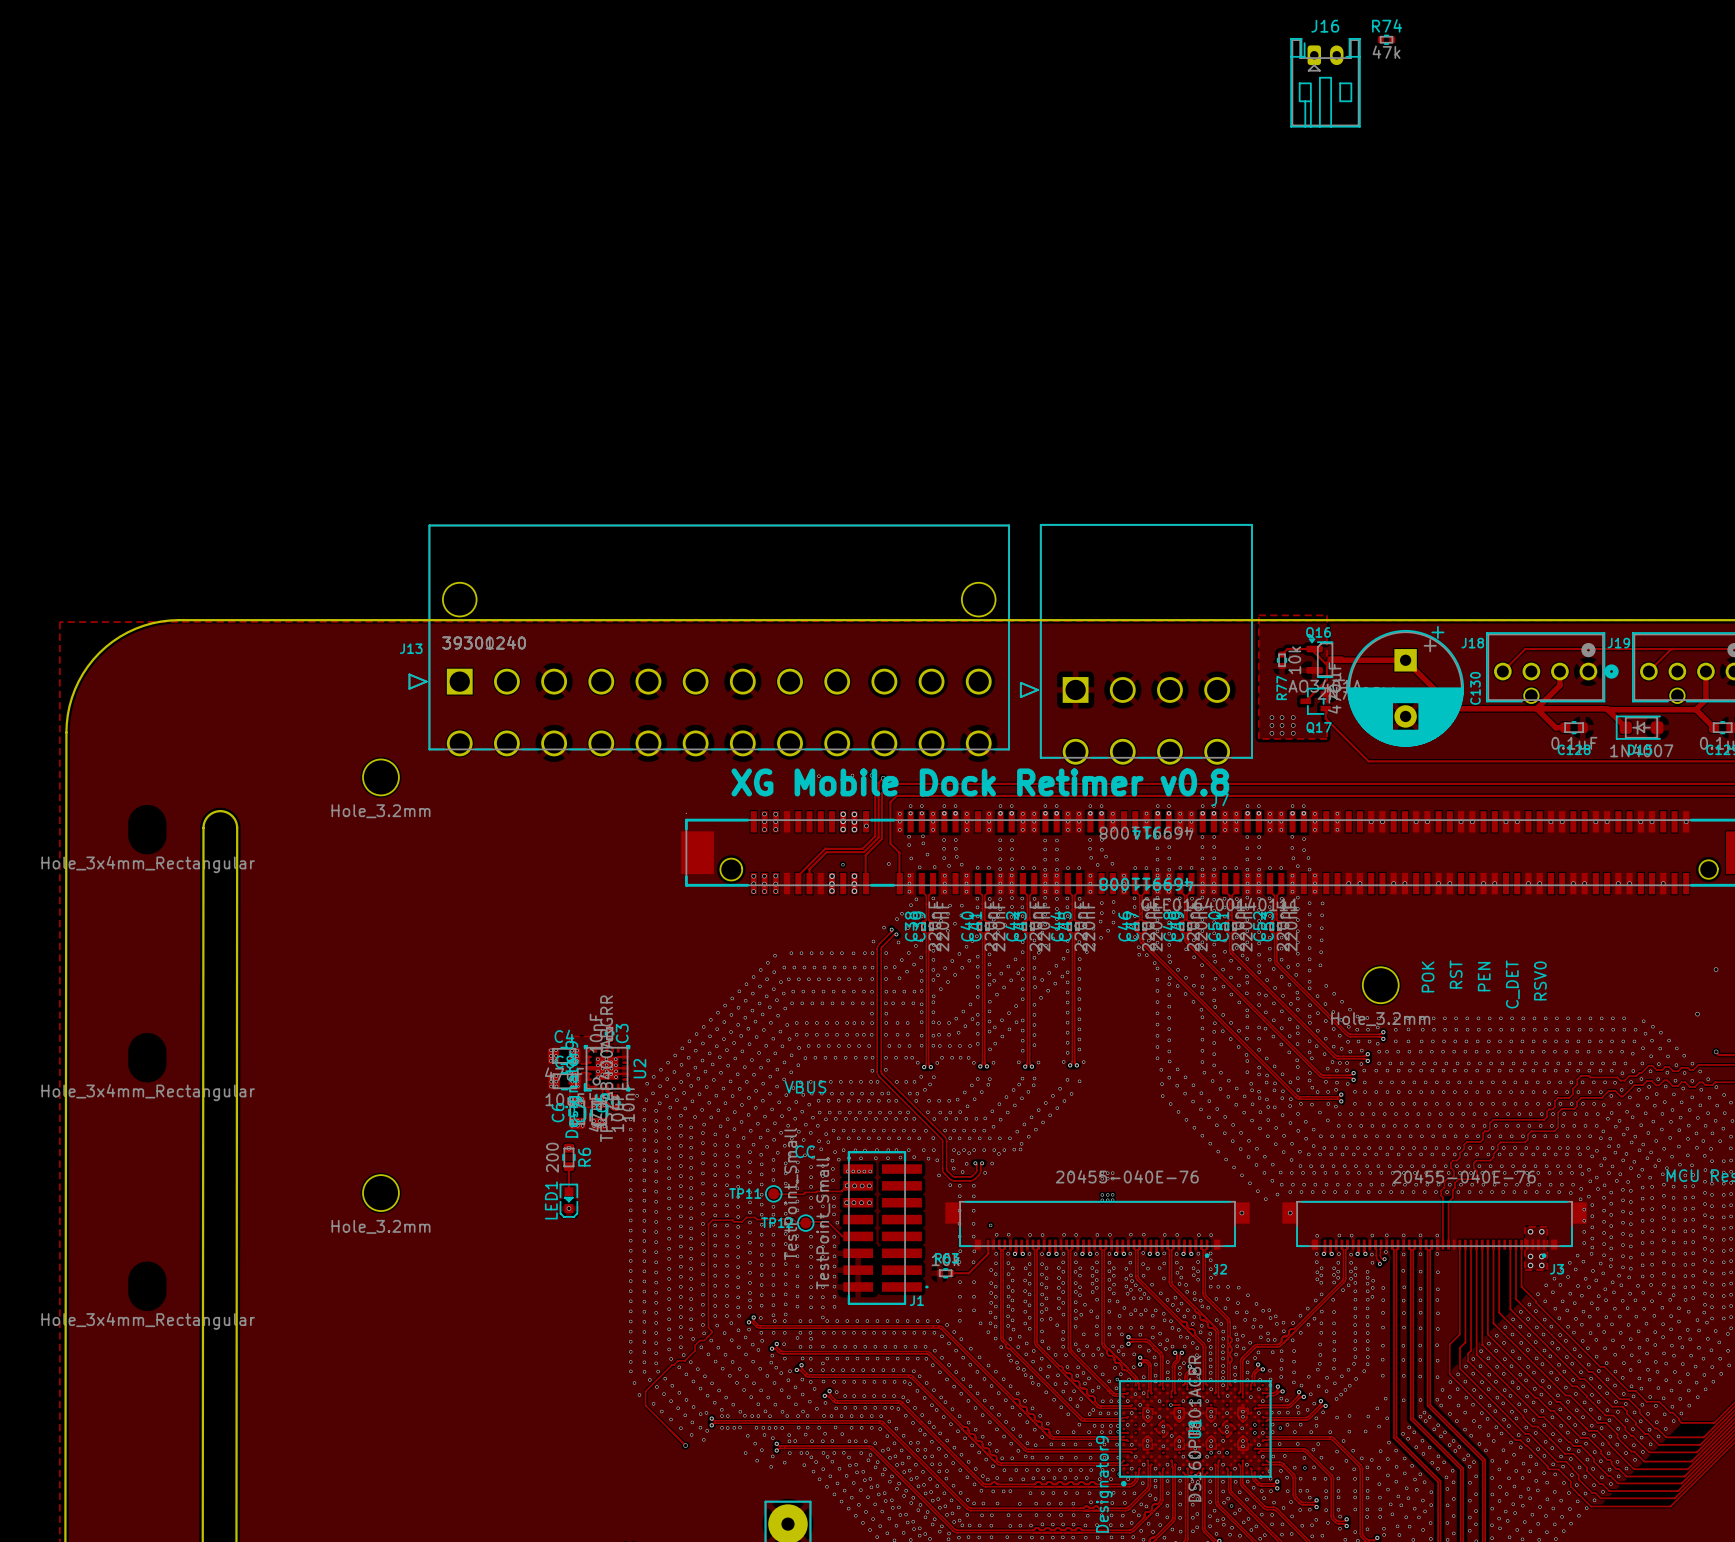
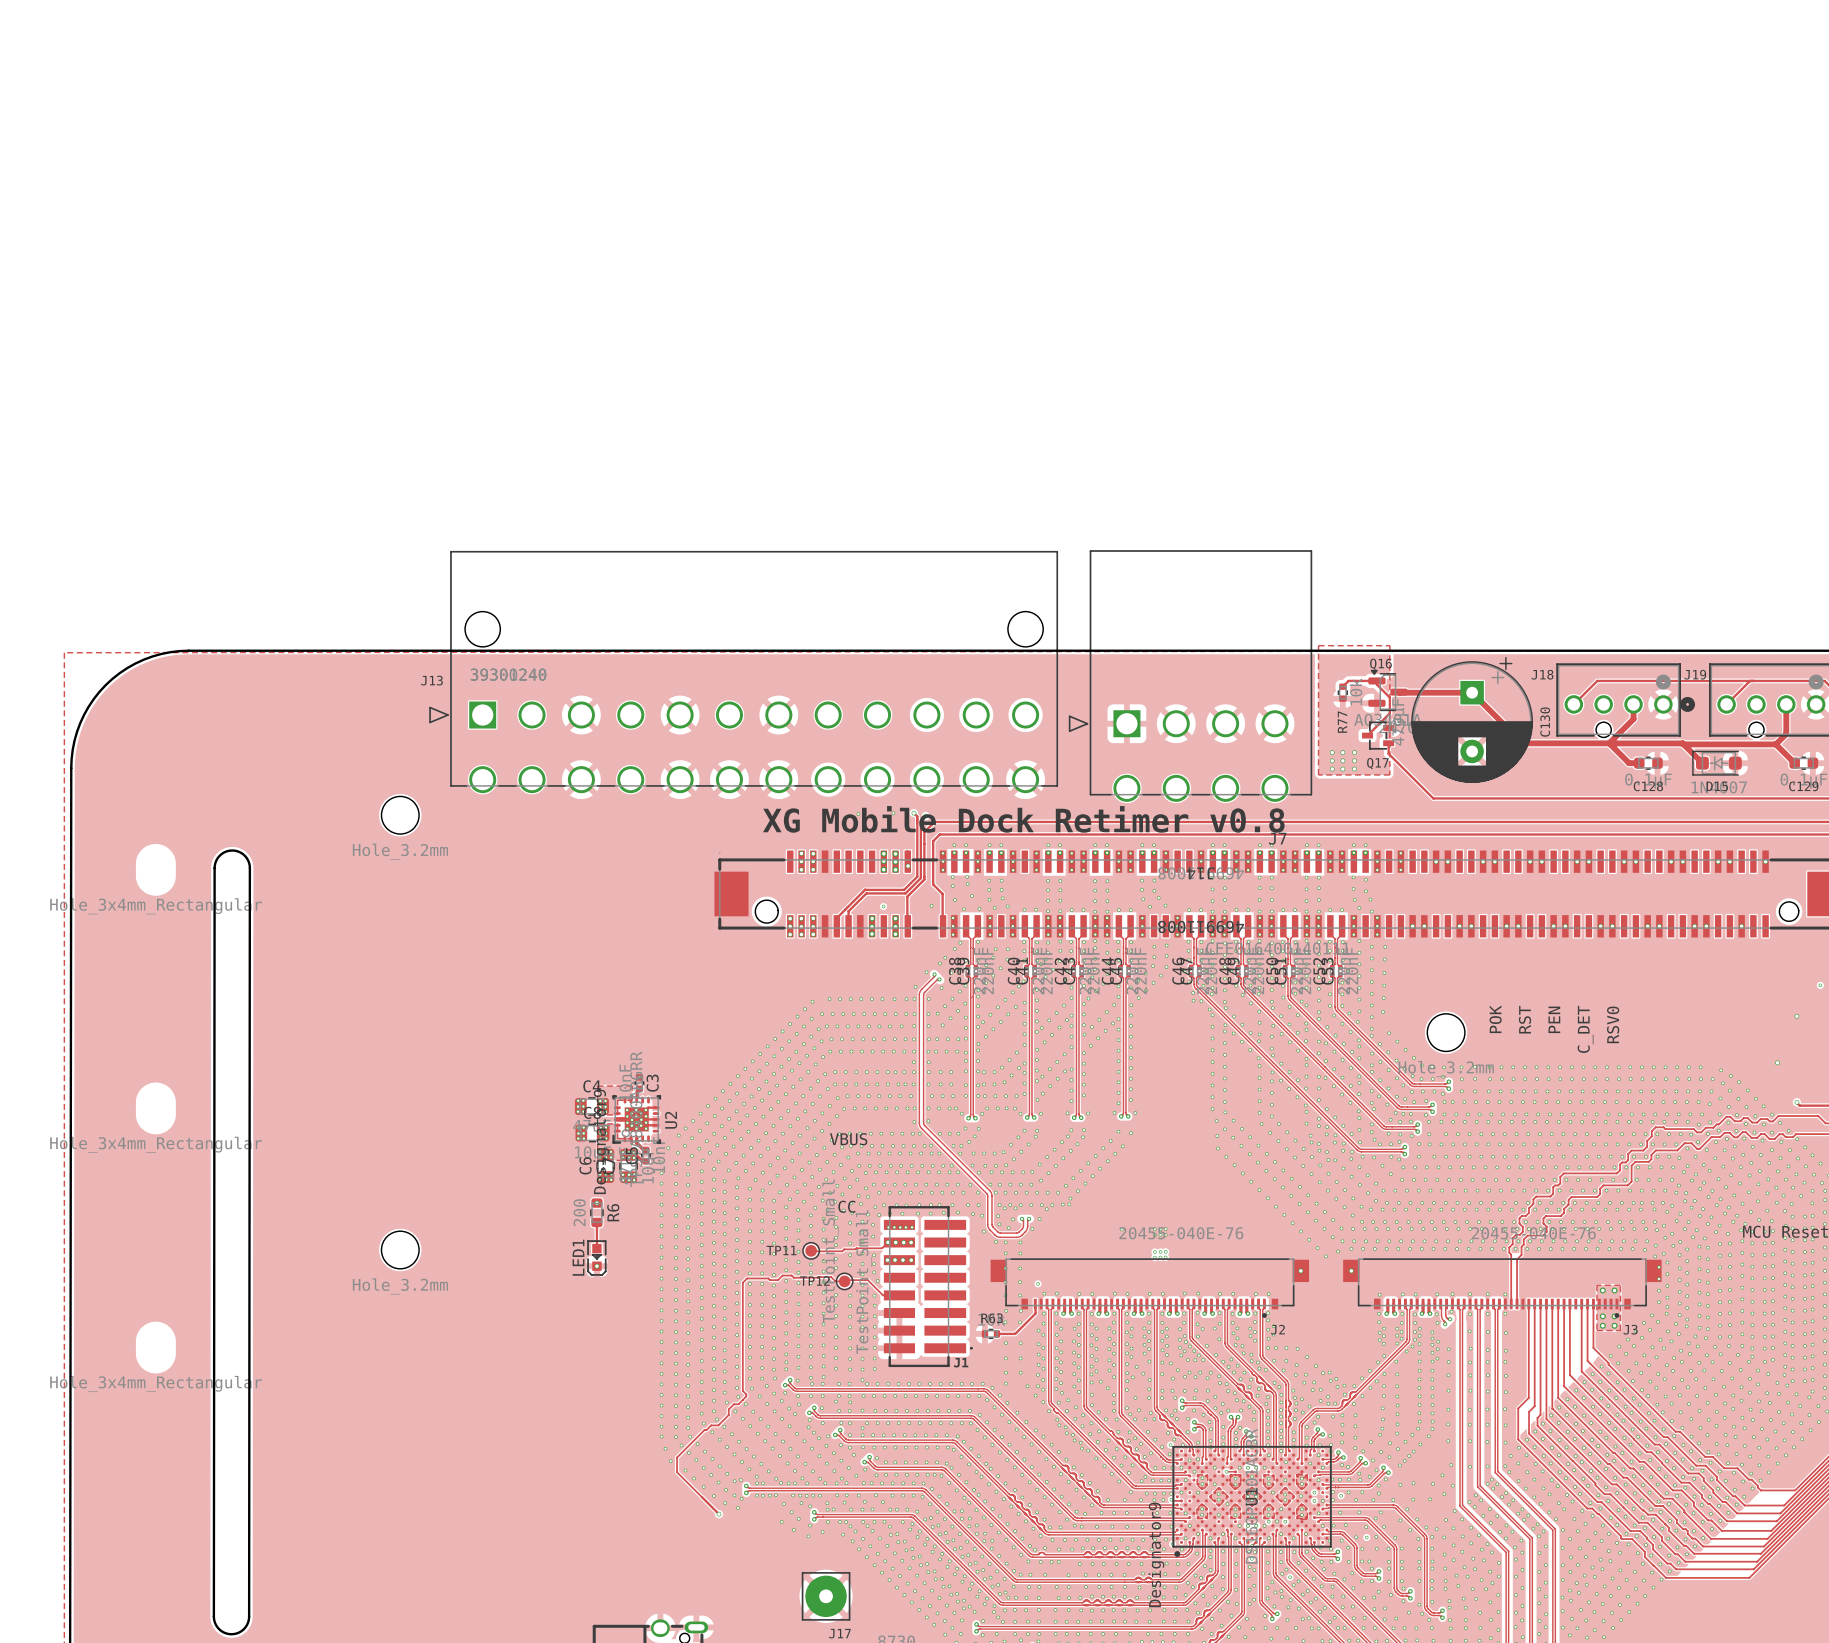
R74: 47k (1386, 39) -> none
J16: (1325, 82) -> none

